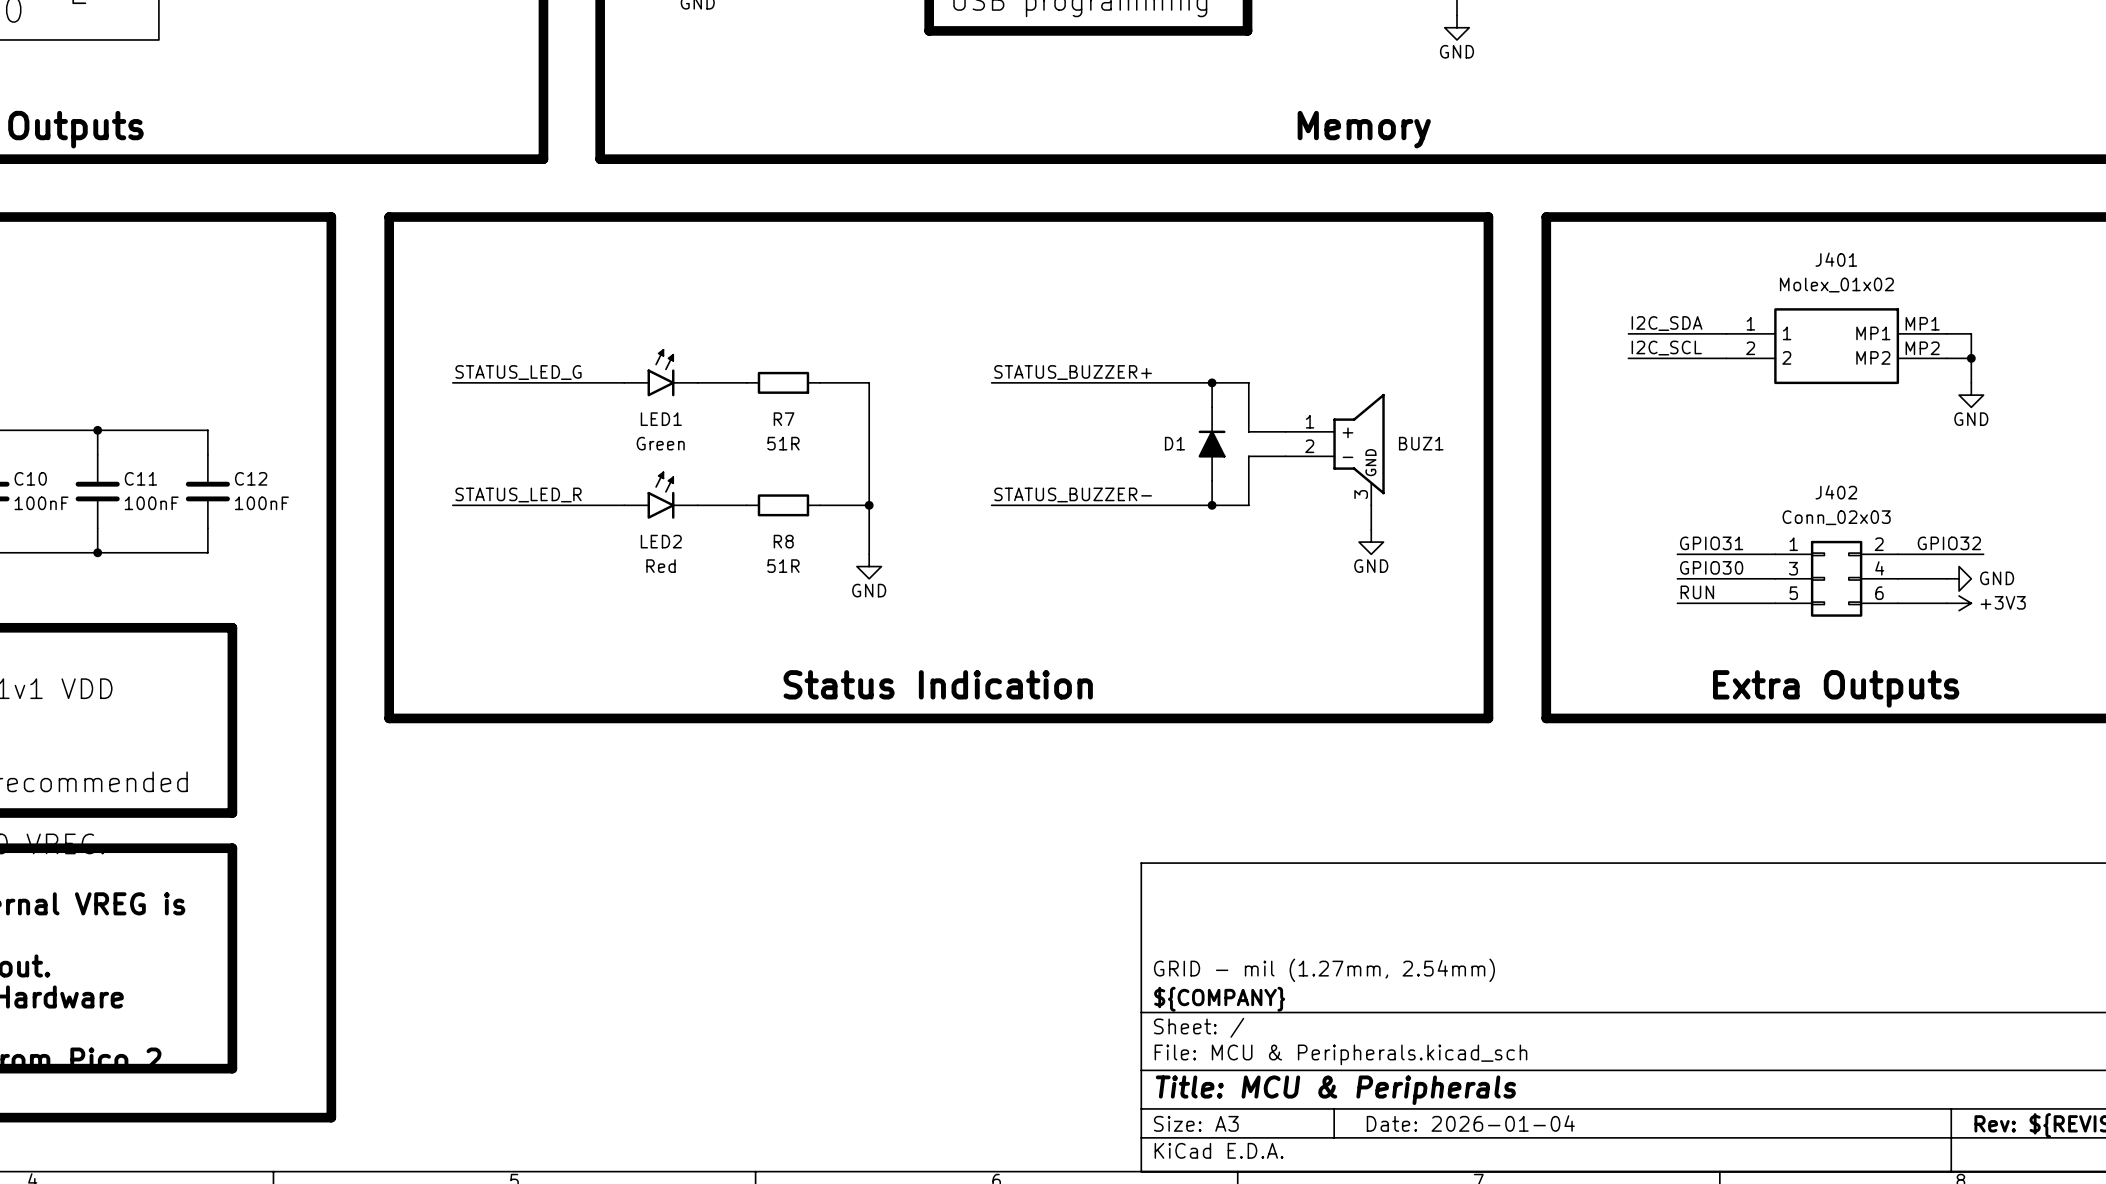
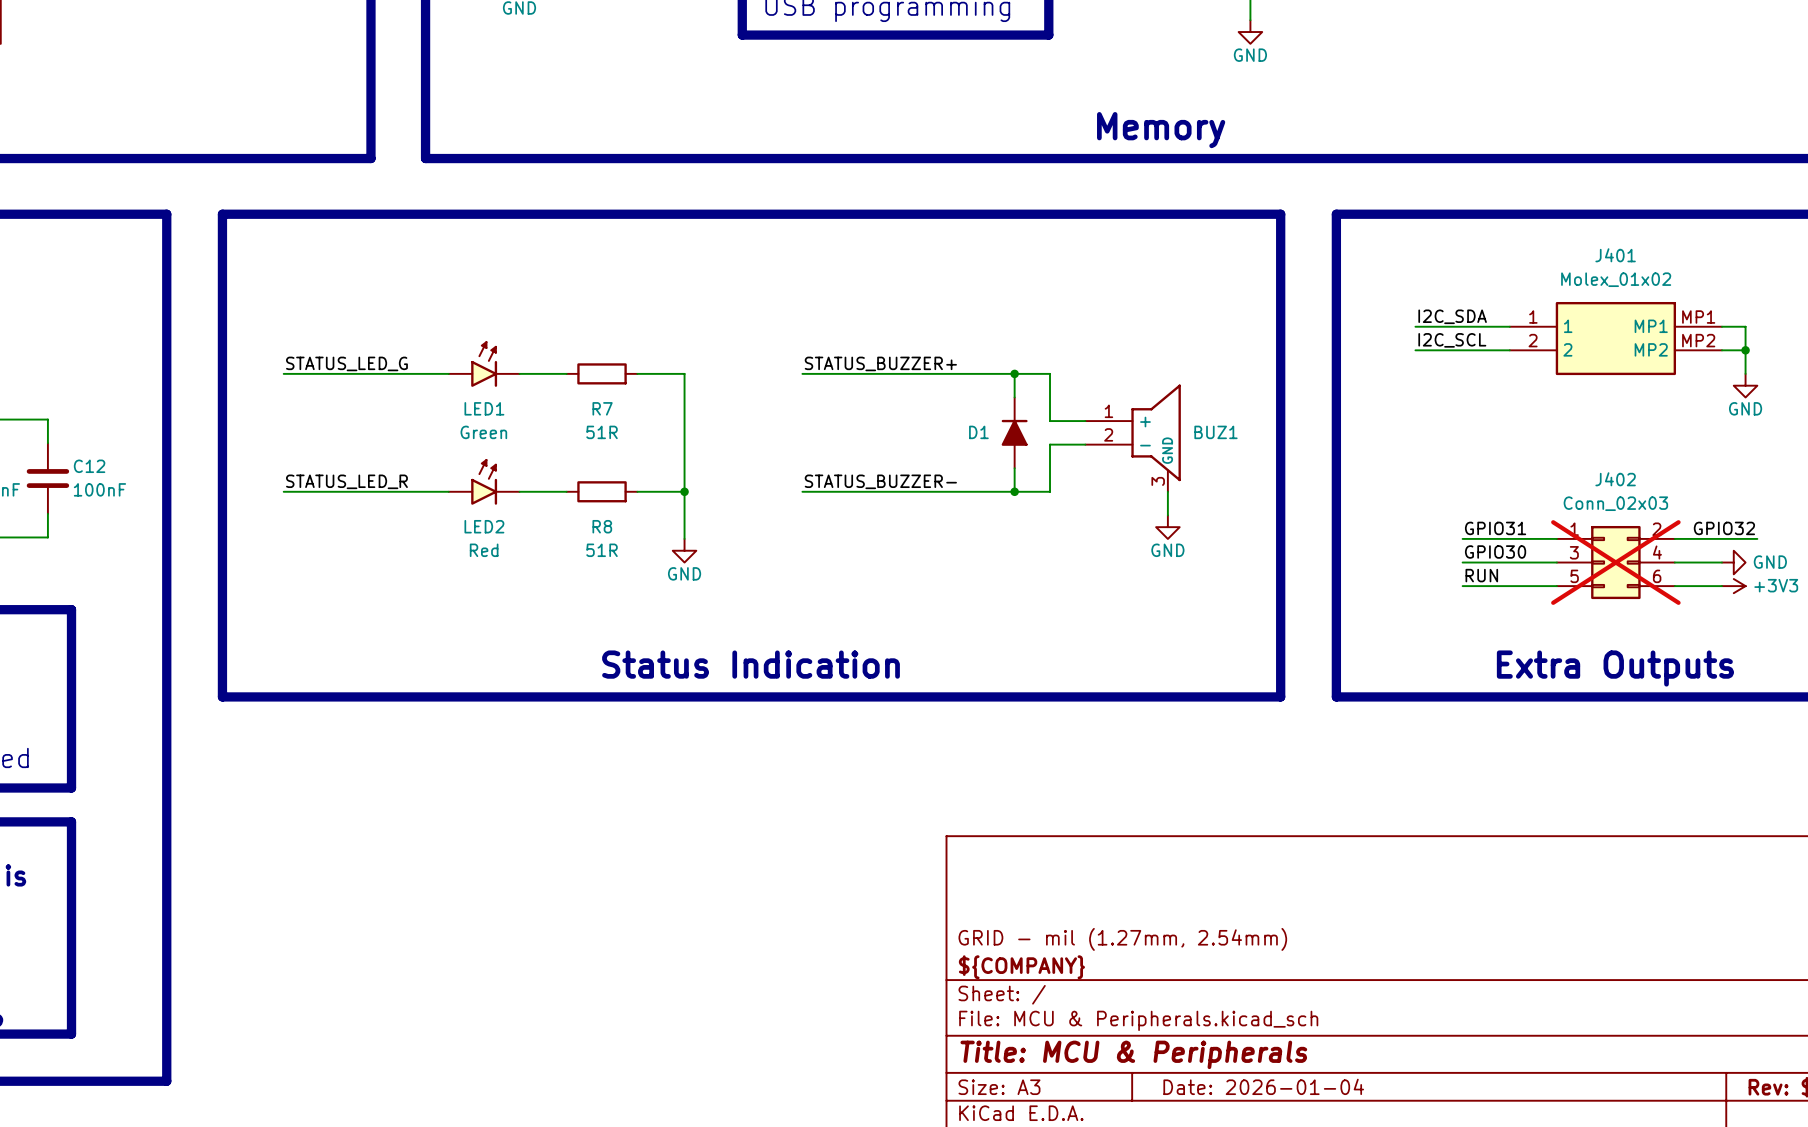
J402 do-not-place cross: none -> (1615, 562)

